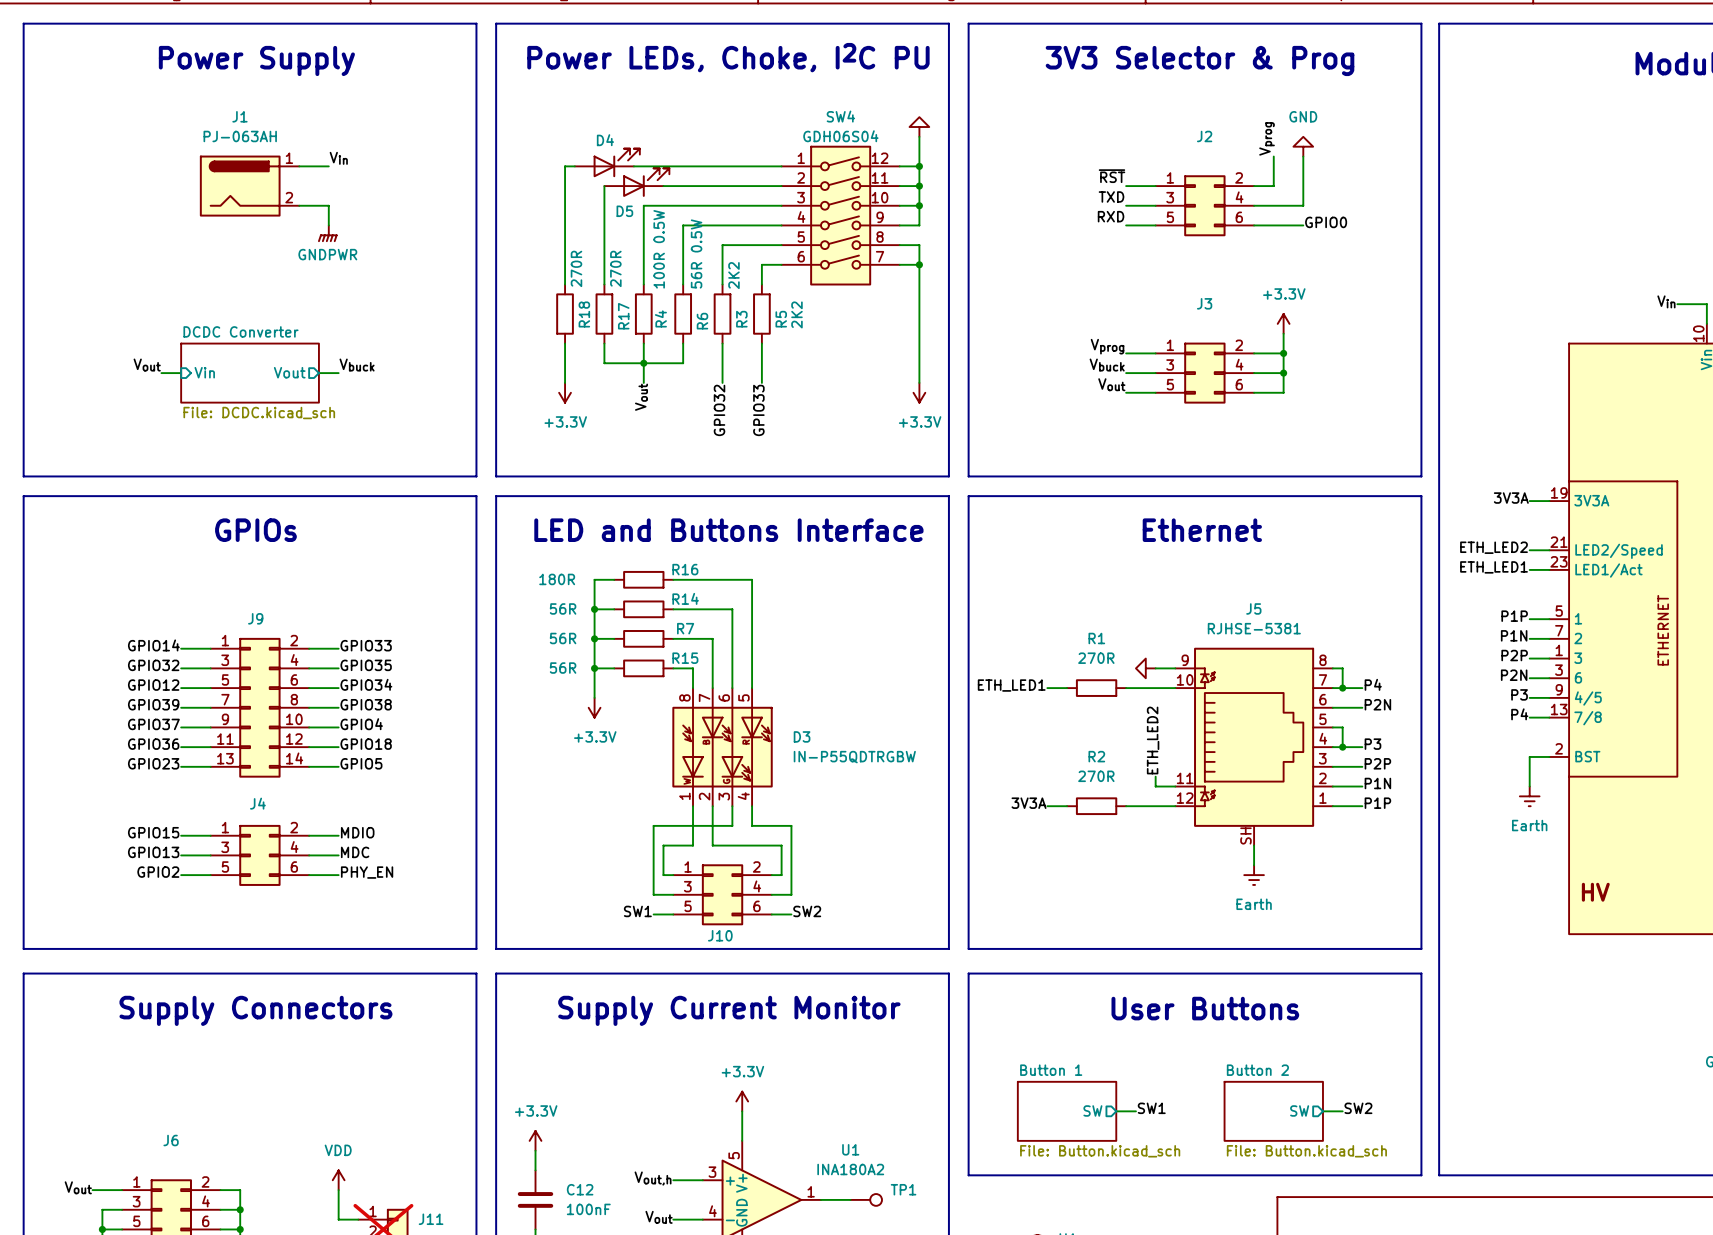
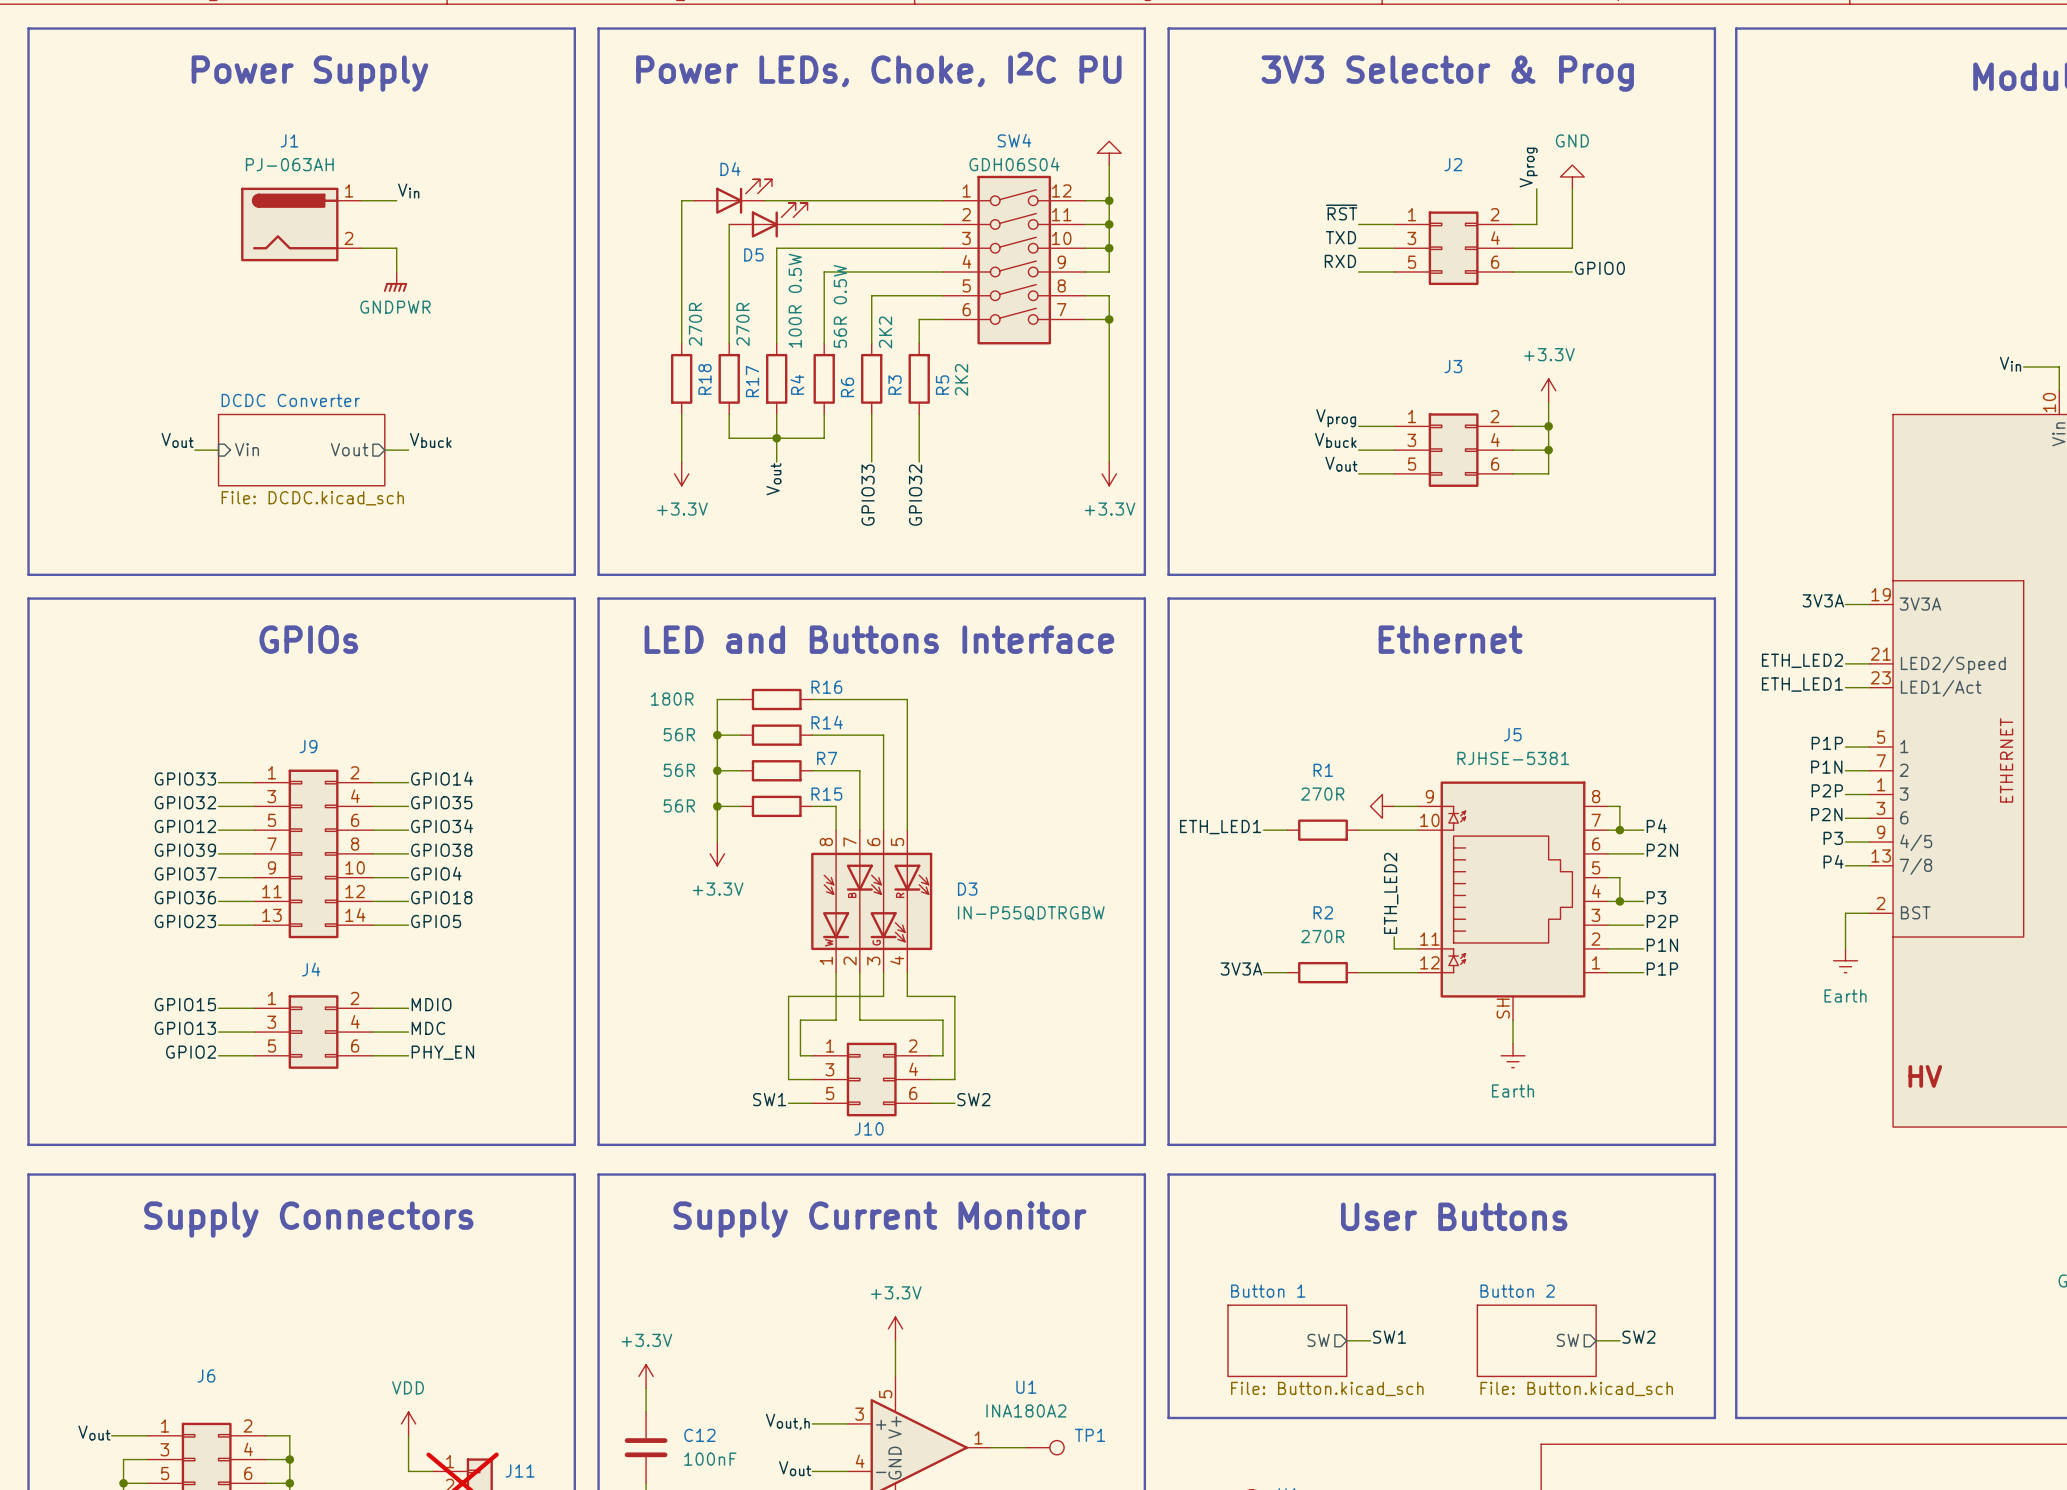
label: GPIO32 (719, 410) -> GPIO33 (868, 495)
label: GPIO33 (758, 410) -> GPIO32 (915, 495)
label: GPIO14 (153, 645) -> GPIO33 (185, 778)
label: GPIO33 (366, 645) -> GPIO14 (442, 778)

